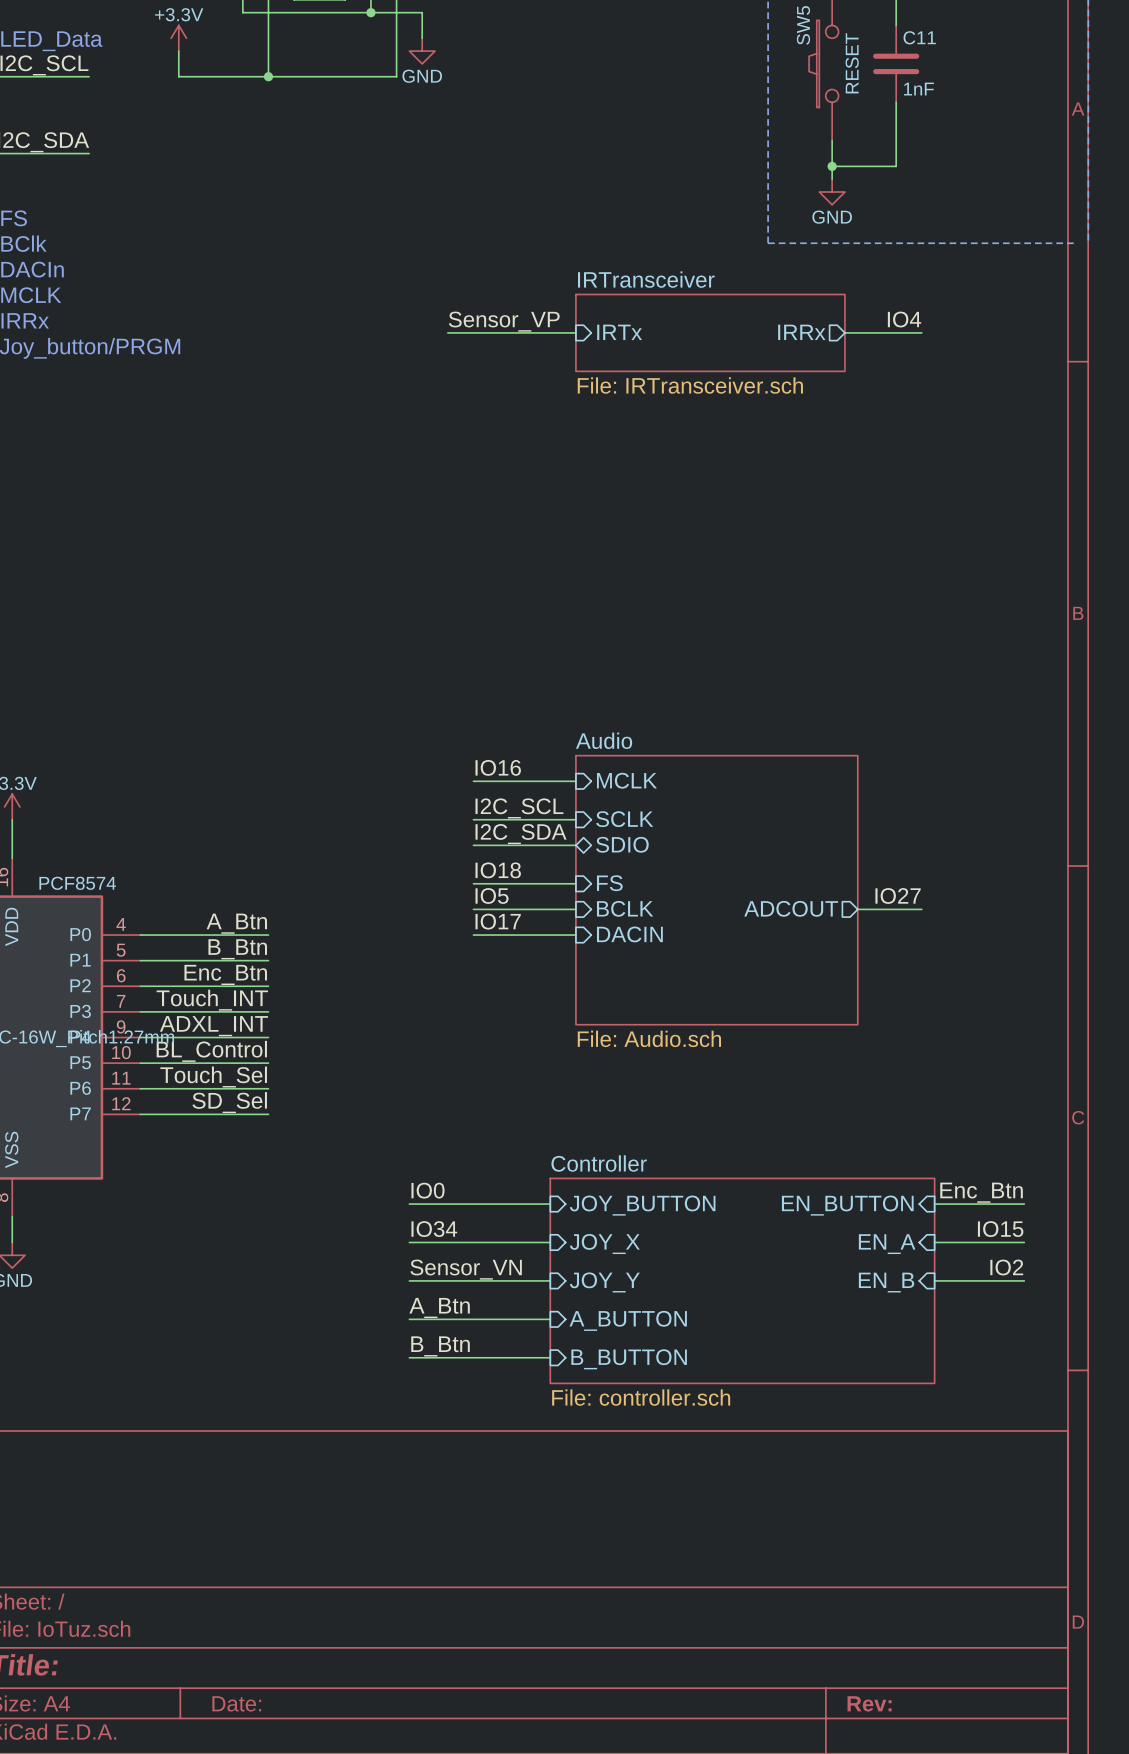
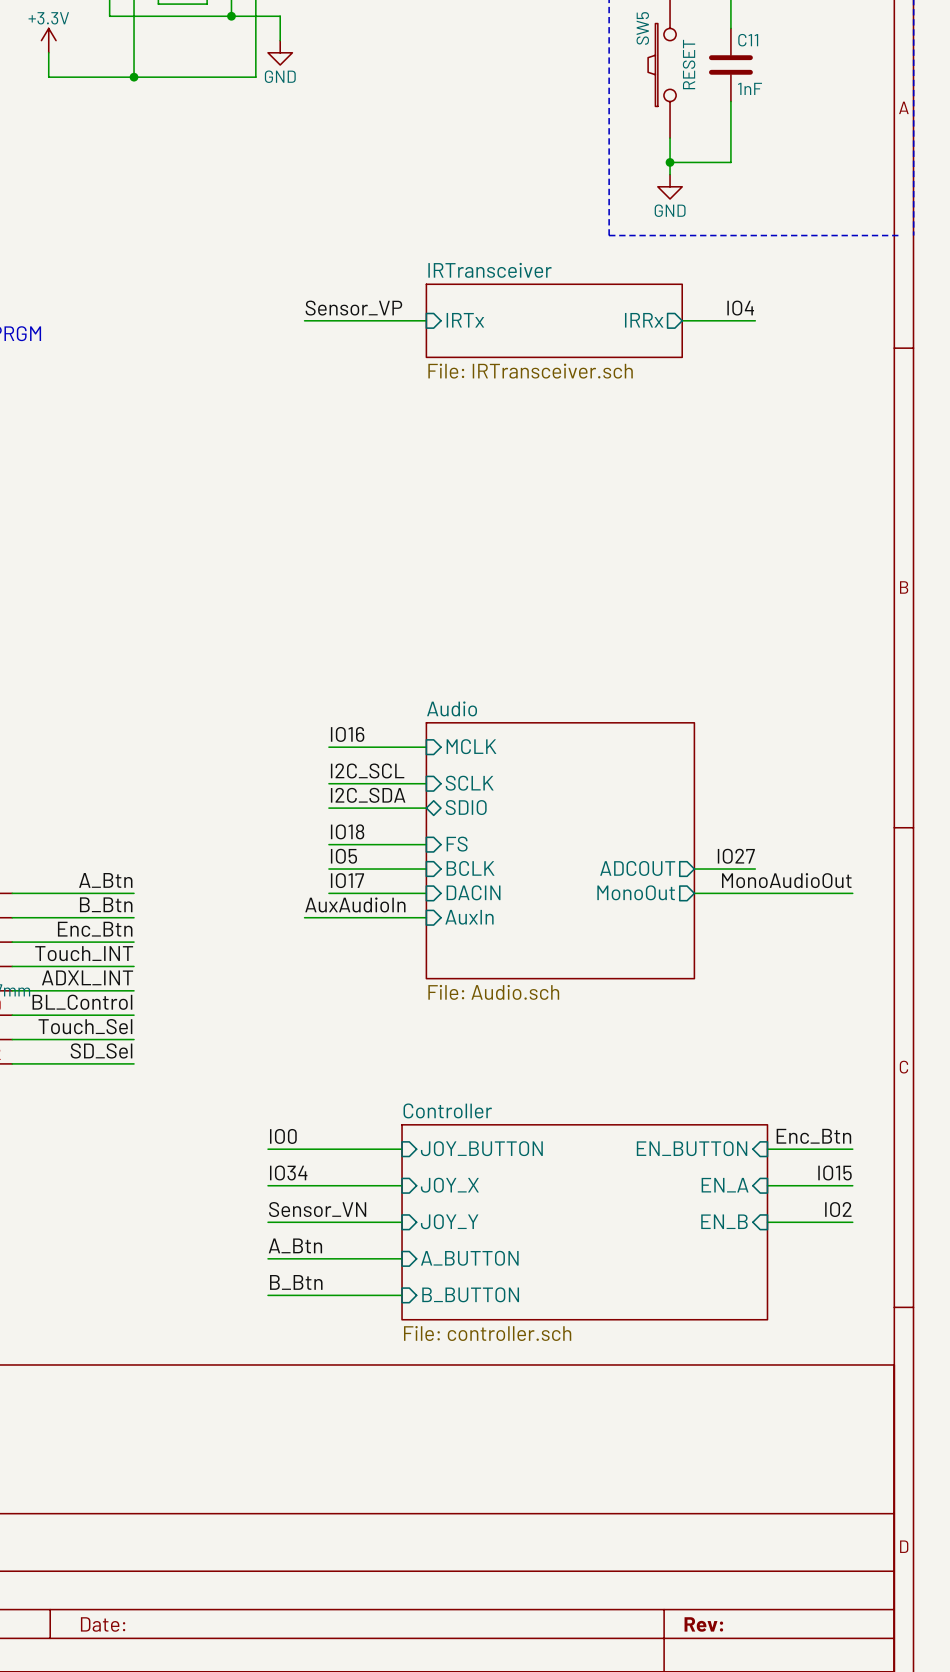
label: none -> MonoAudioOut (786, 880)
sheet pin: none -> MonoOut (636, 892)
wire: none -> (694, 893) (852, 893)
label: none -> AuxAudioIn (355, 904)
wire: none -> (304, 917) (426, 917)
sheet pin: none -> AuxIn (469, 917)

